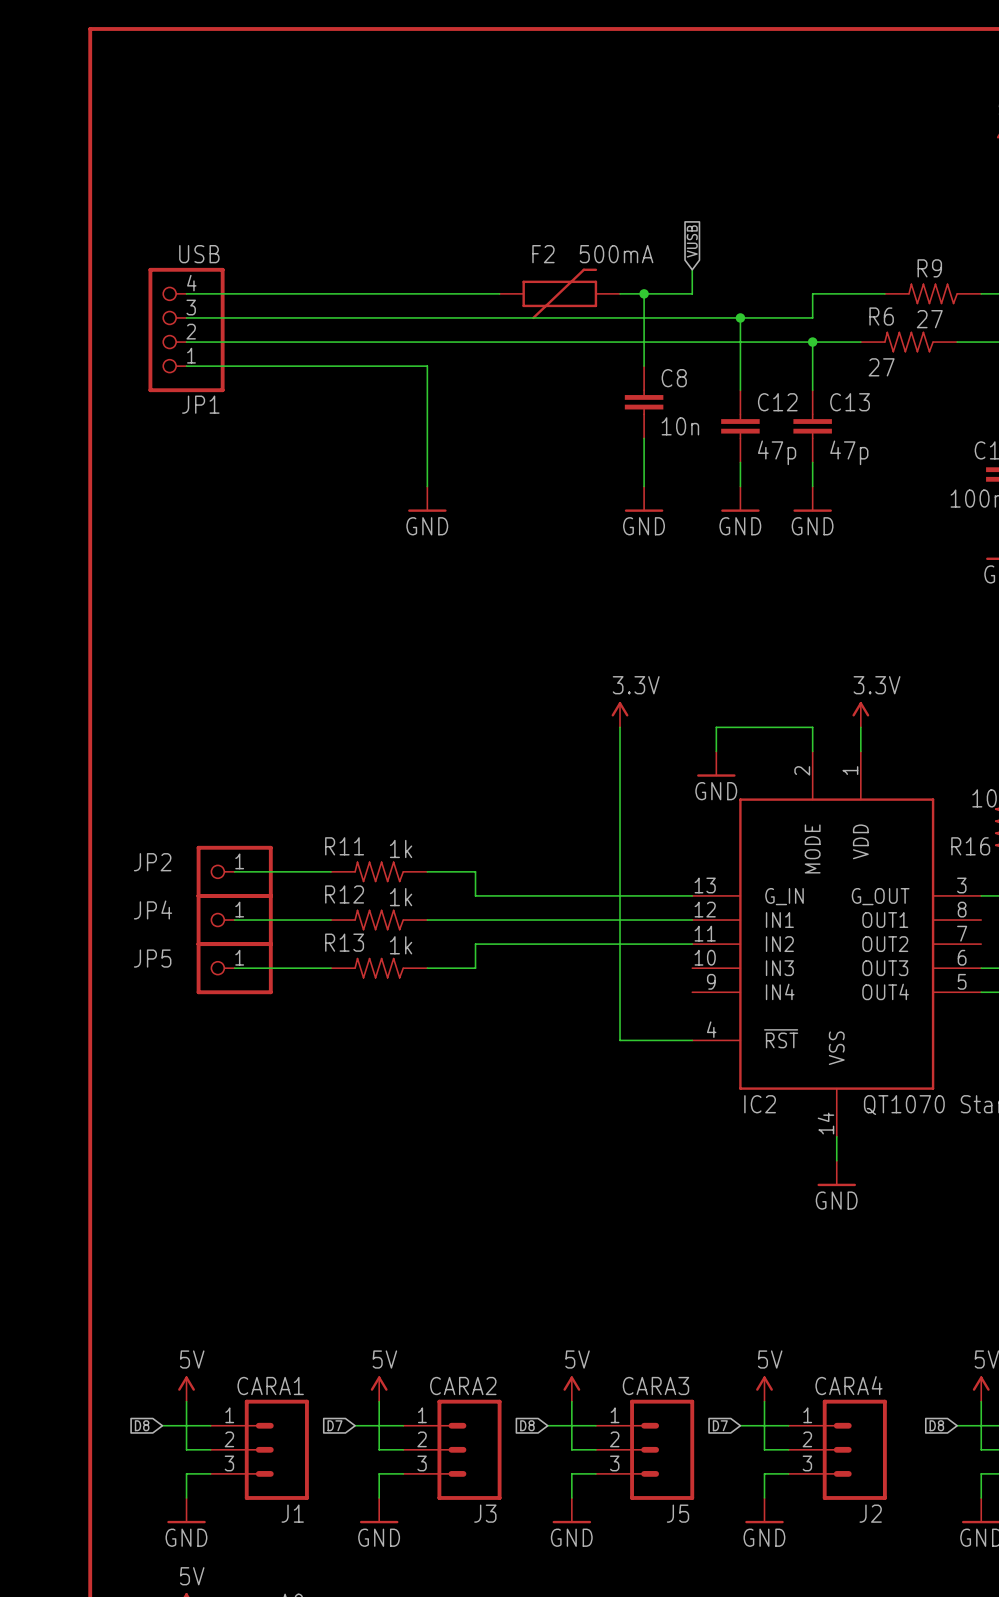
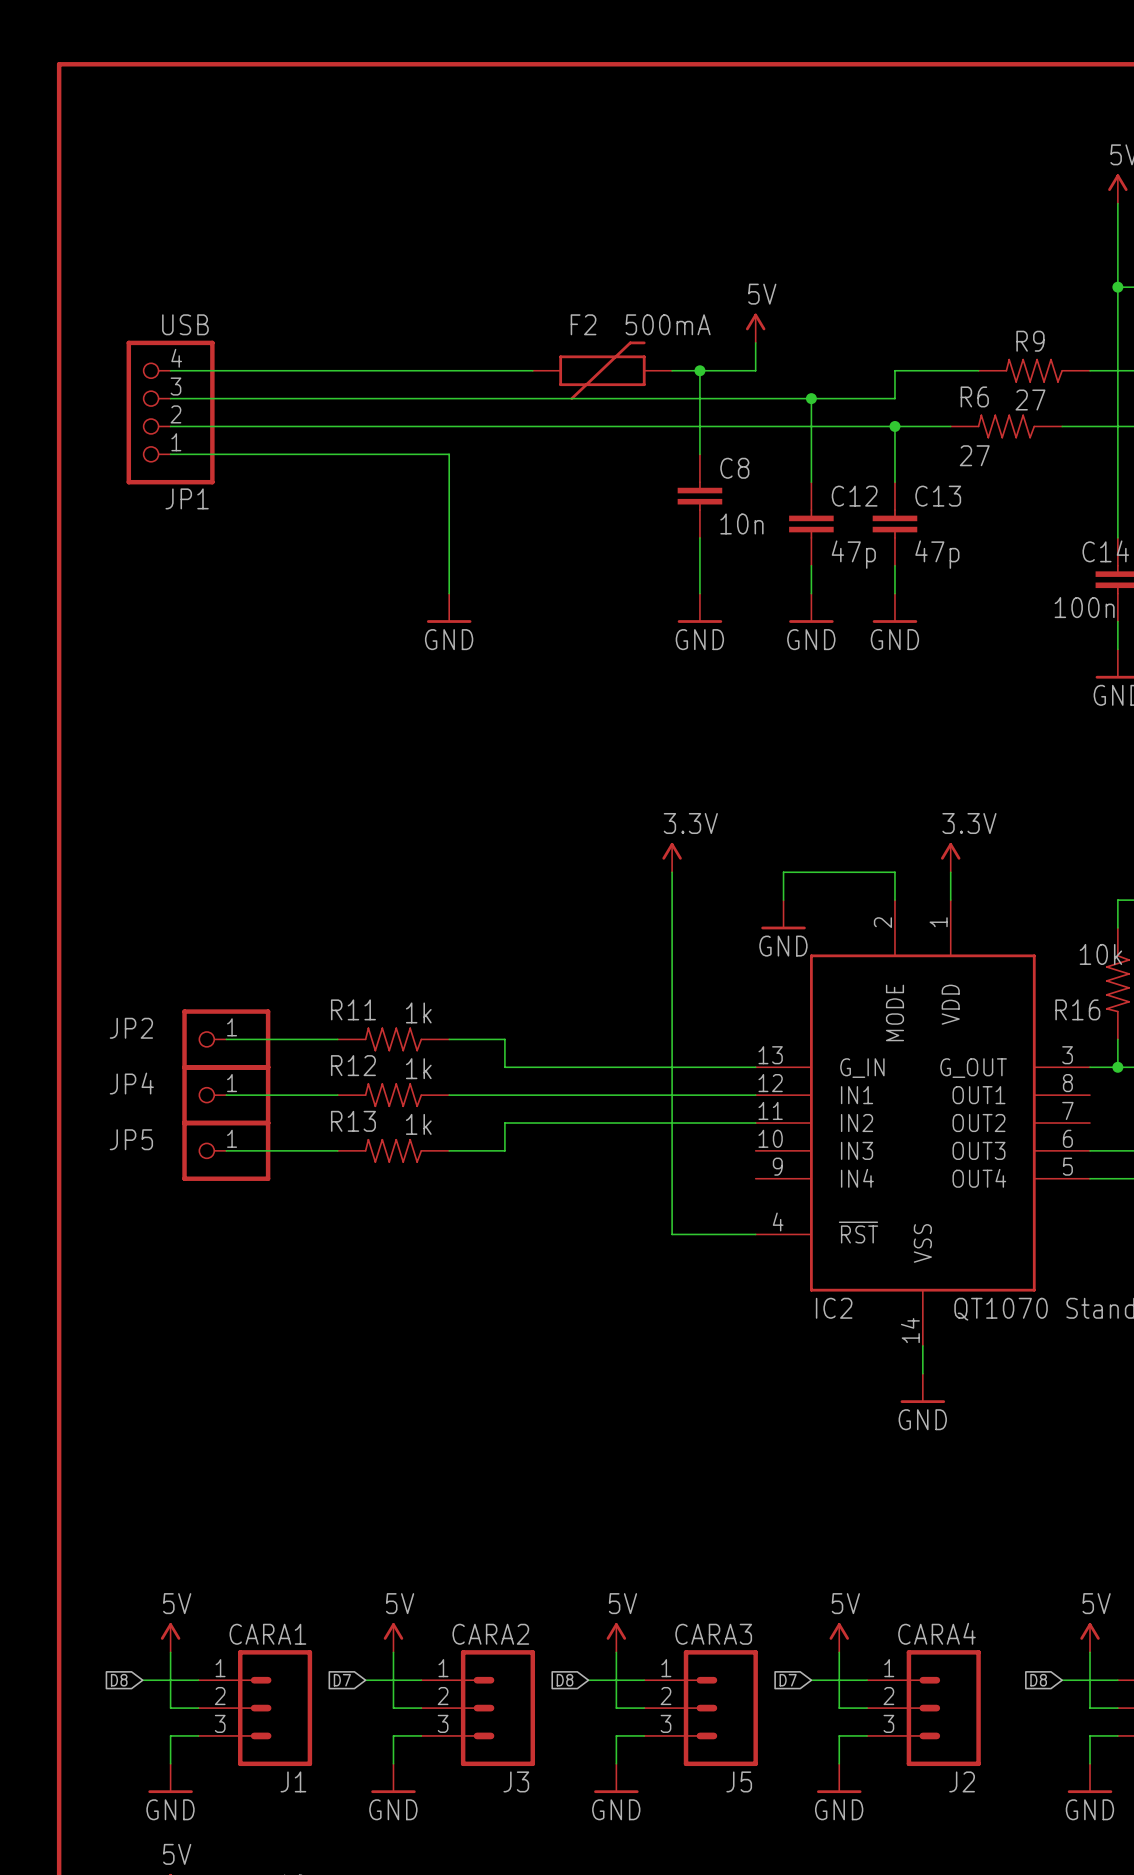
global label: VUSB (692, 241) -> none
power symbol: none -> 5V (755, 328)

